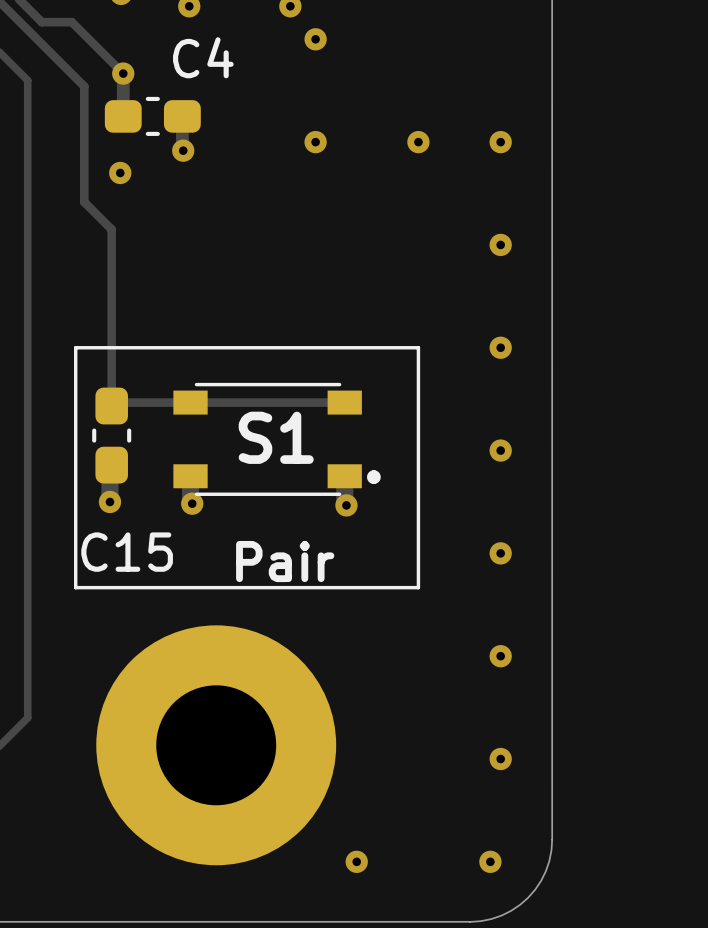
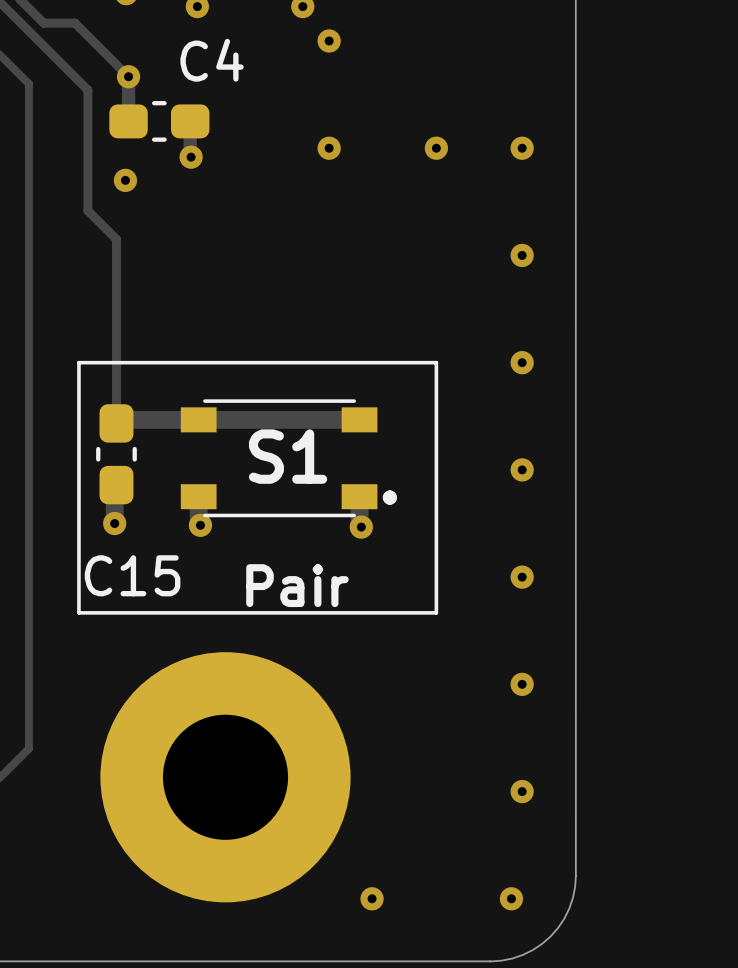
track width: thin (115, 402) (344, 402) -> thick (120, 419) (359, 419)

